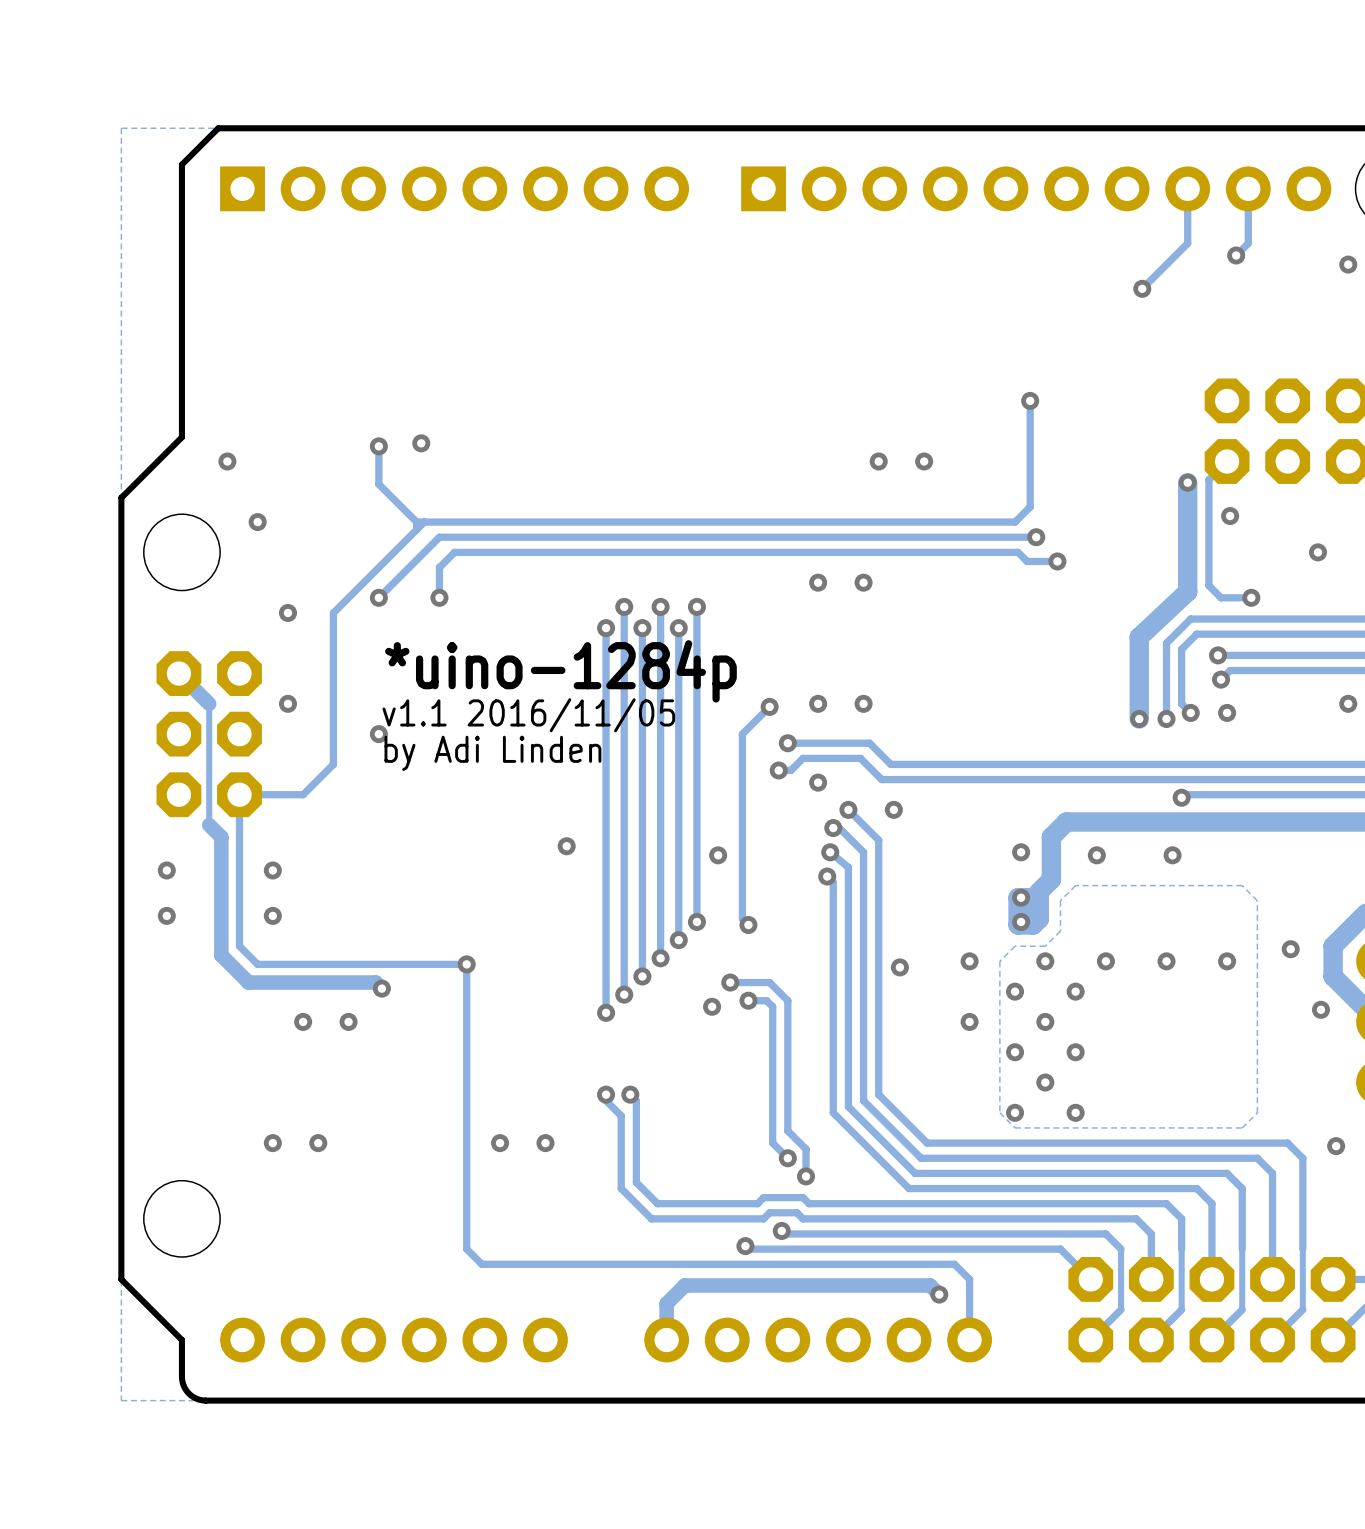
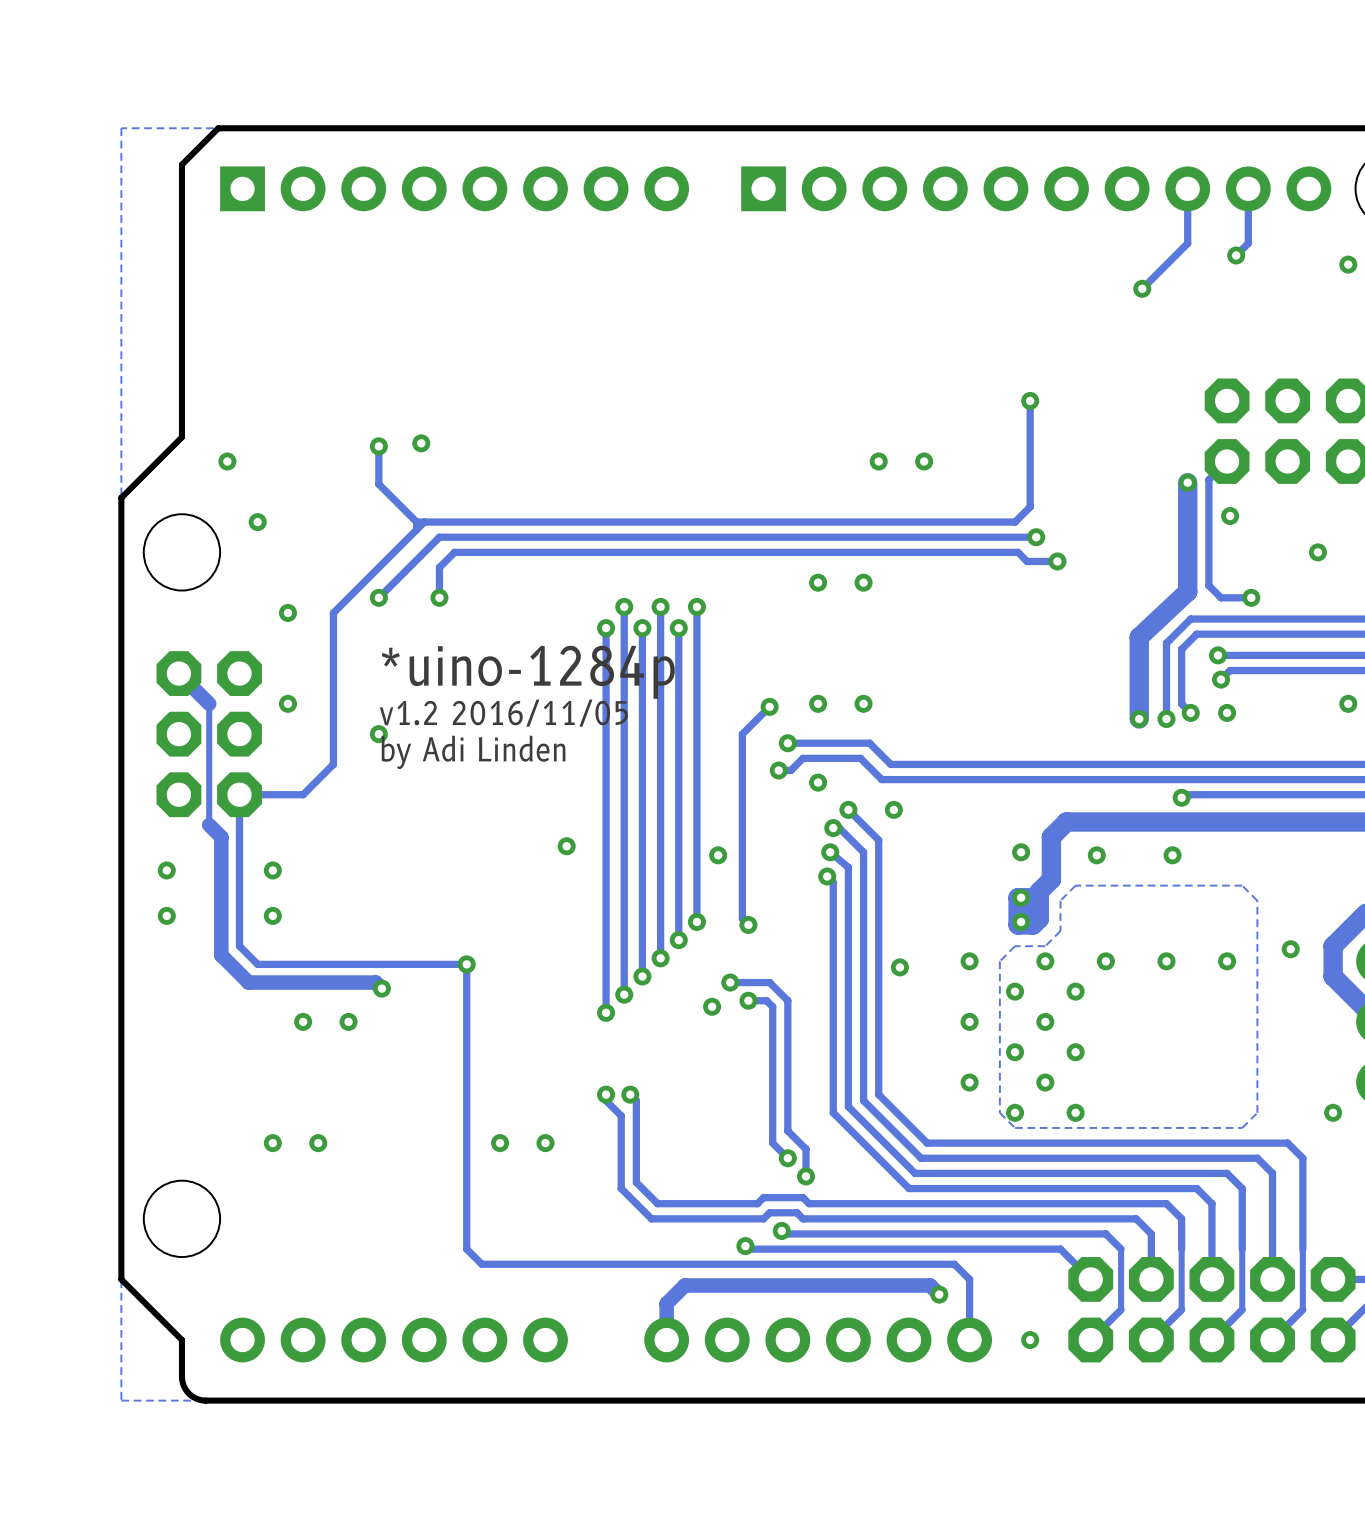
text: v1.1 2016/11/05 (528, 715) -> v1.2 2016/11/05 (503, 713)
via: (1321, 1009) -> none
via: none -> (969, 1082)
via position: (1336, 1146) -> (1333, 1112)
via: none -> (1030, 1340)

